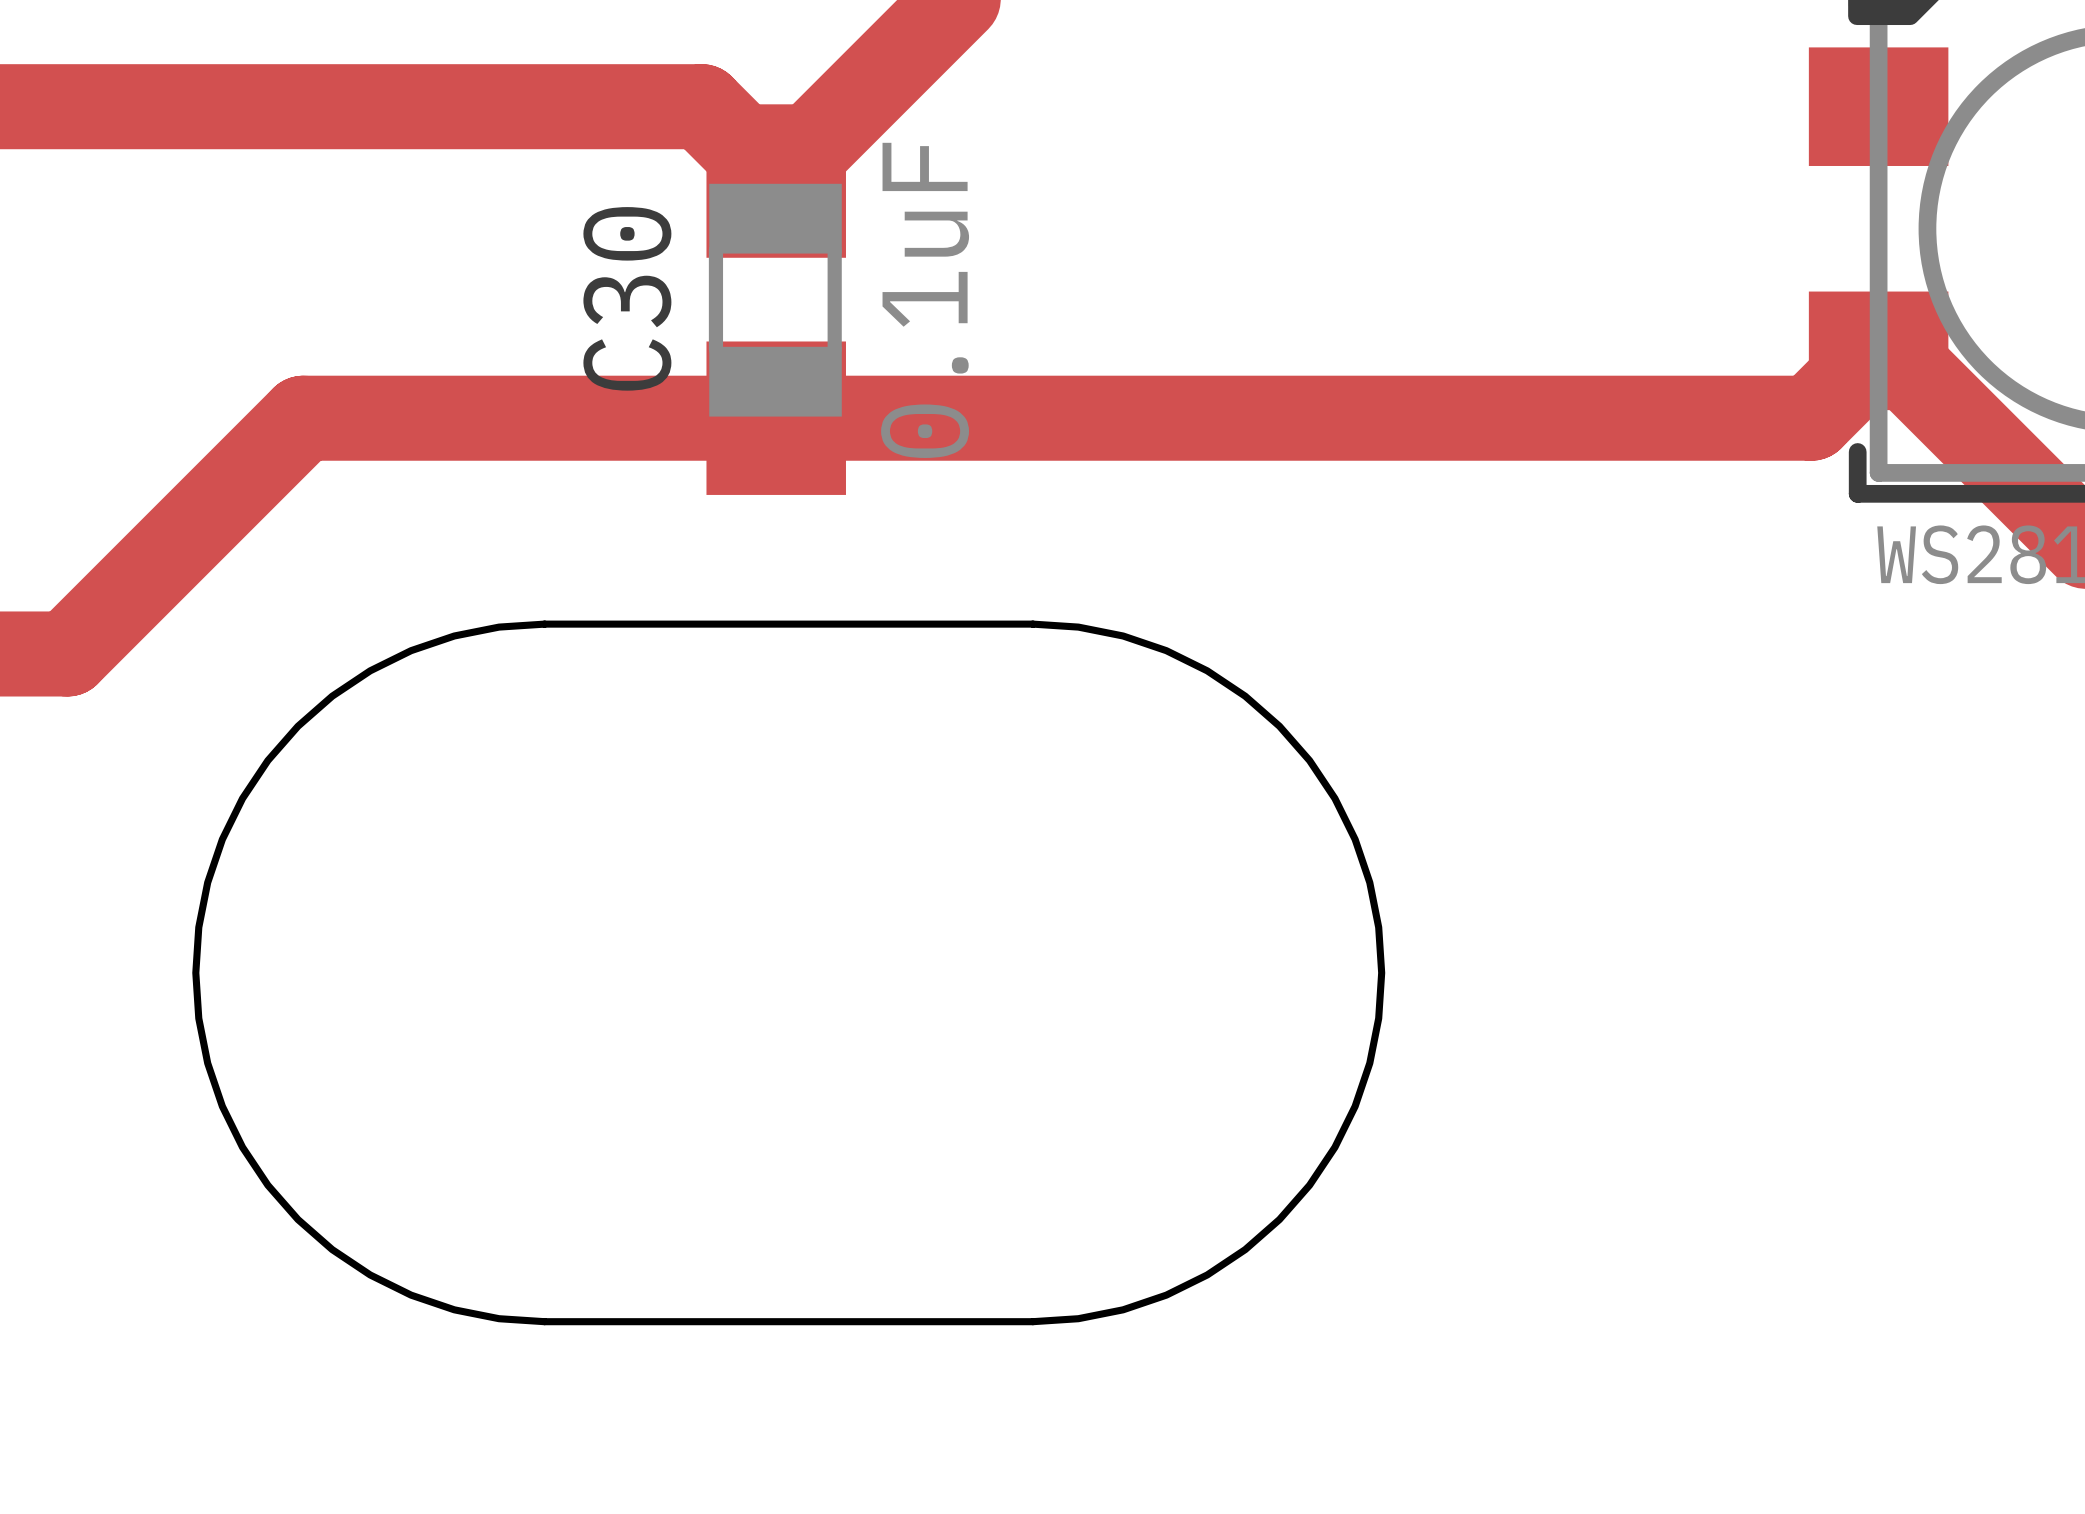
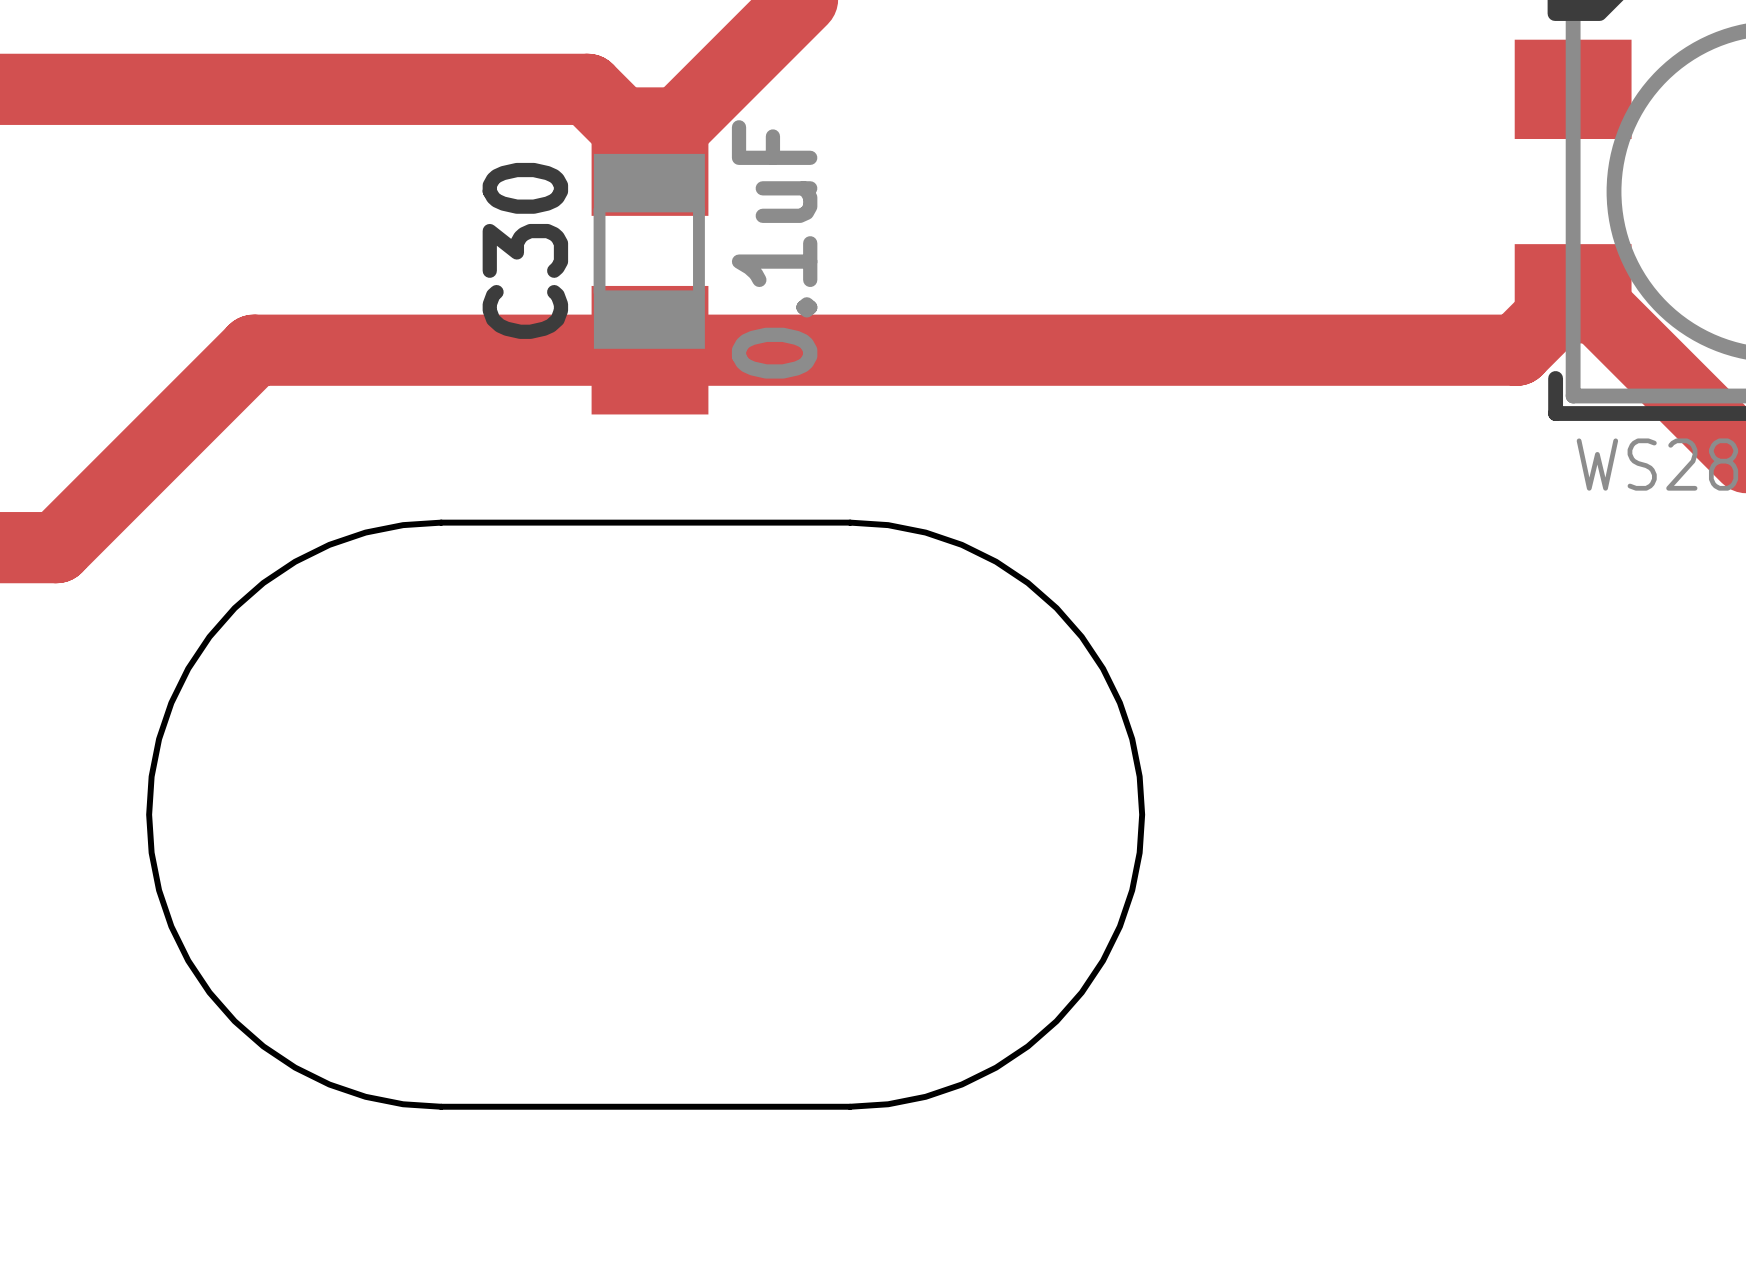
board edge: (544, 624) (499, 627) (454, 636) (411, 650) (370, 670) (332, 696) (297, 726) (267, 760) (242, 798) (222, 839) (207, 882) (198, 927) (195, 972) (198, 1018) (207, 1063) (222, 1106) (242, 1147) (267, 1185) (297, 1219) (332, 1249) (370, 1274) (411, 1295) (454, 1309) (499, 1318) (544, 1321) -> (456, 522) (403, 525) (365, 532) (329, 544) (295, 561) (263, 582) (234, 608) (209, 636) (188, 668) (171, 702) (159, 739) (151, 776) (149, 814) (151, 852) (159, 890) (171, 926) (188, 960) (209, 992) (234, 1021) (263, 1046) (295, 1067) (329, 1084) (365, 1096) (403, 1104) (456, 1106)
board edge: (1015, 624) (1078, 627) (1123, 636) (1166, 650) (1207, 670) (1245, 696) (1279, 726) (1309, 760) (1334, 798) (1355, 839) (1369, 882) (1378, 927) (1381, 972) (1378, 1018) (1369, 1063) (1355, 1106) (1334, 1147) (1309, 1185) (1279, 1219) (1245, 1249) (1207, 1274) (1166, 1295) (1123, 1309) (1078, 1318) (1015, 1321) -> (850, 522) (888, 525) (925, 532) (961, 544) (996, 561) (1027, 582) (1056, 608) (1081, 636) (1103, 668) (1119, 702) (1132, 739) (1139, 776) (1142, 814) (1139, 852) (1132, 890) (1119, 926) (1103, 960) (1081, 992) (1056, 1021) (1027, 1046) (996, 1067) (961, 1084) (925, 1096) (888, 1104) (850, 1106)

